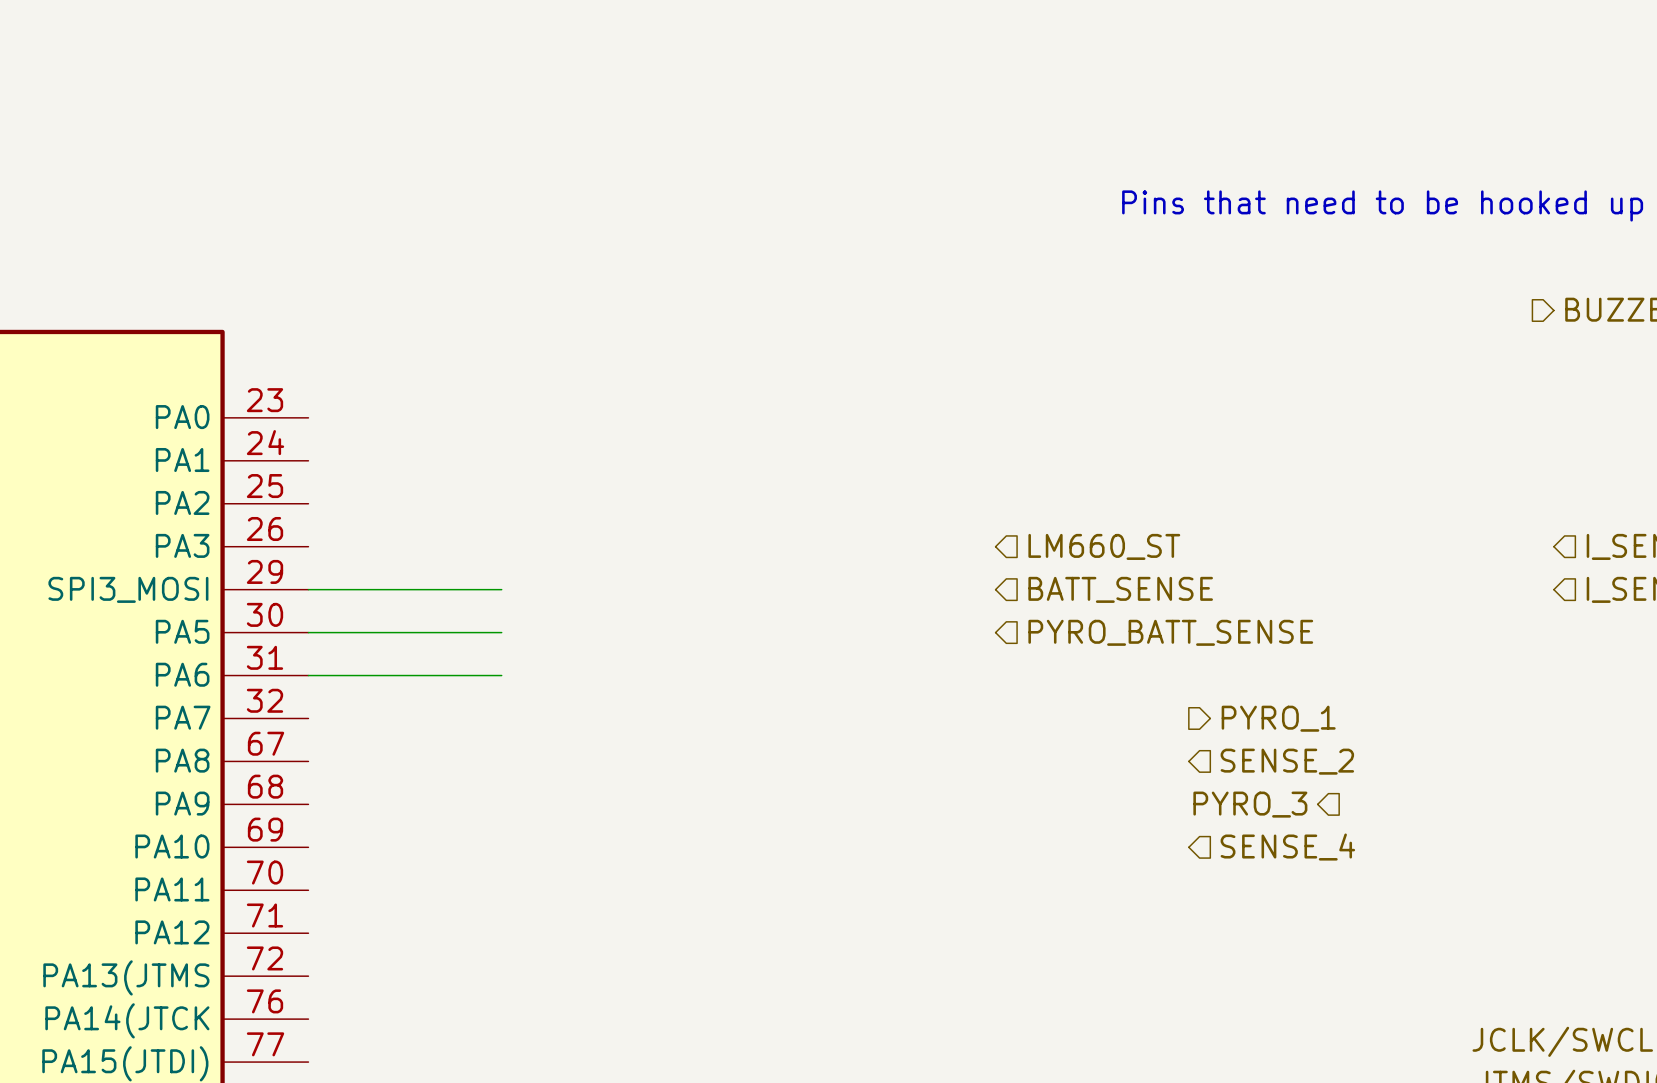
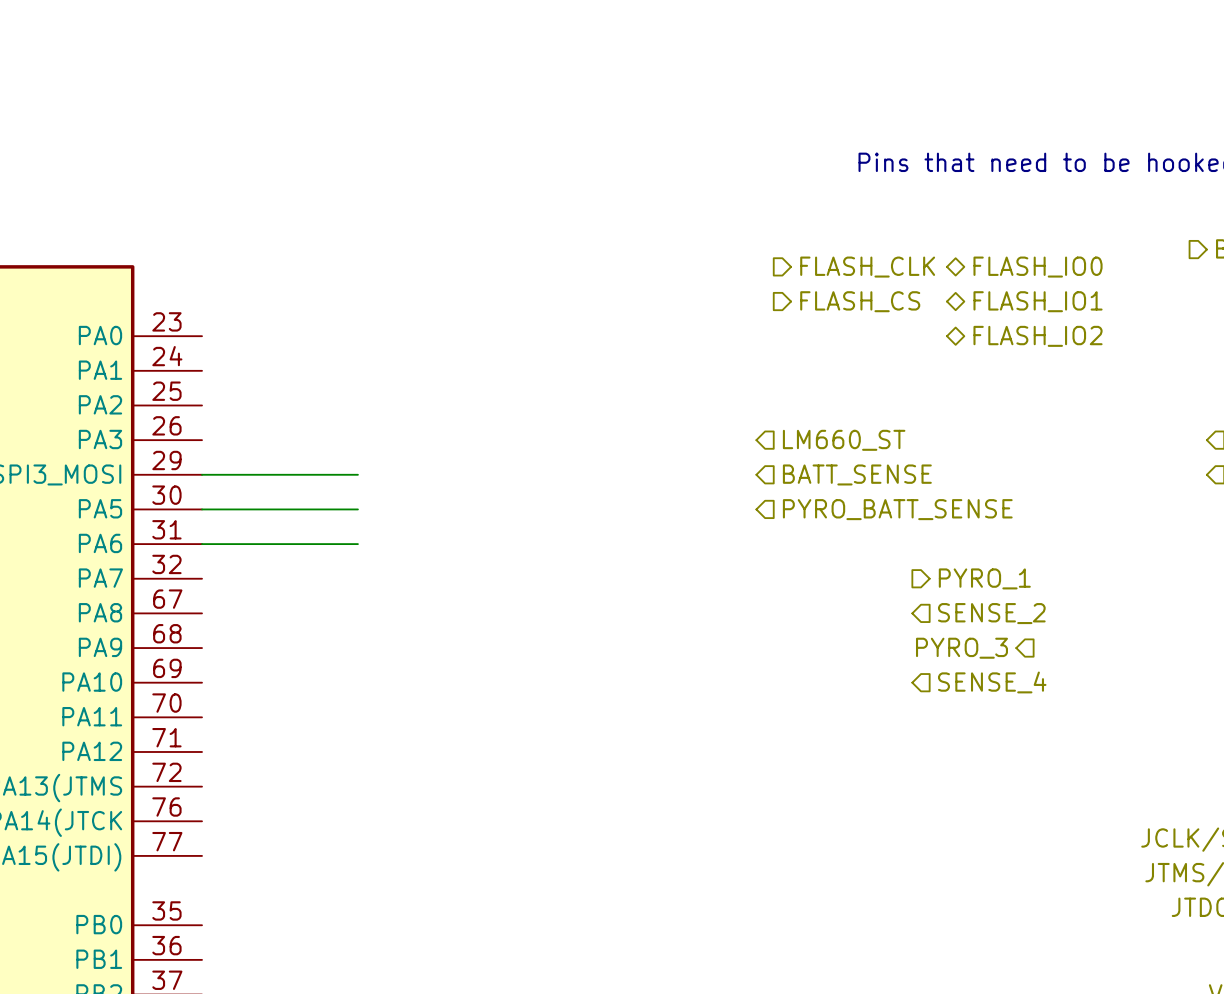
hierarchical label: none -> FLASH_CLK (867, 267)
hierarchical label: none -> FLASH_IO0 (1038, 267)
hierarchical label: none -> FLASH_CS (860, 301)
hierarchical label: none -> FLASH_IO1 (1038, 301)
hierarchical label: none -> FLASH_IO2 (1038, 336)

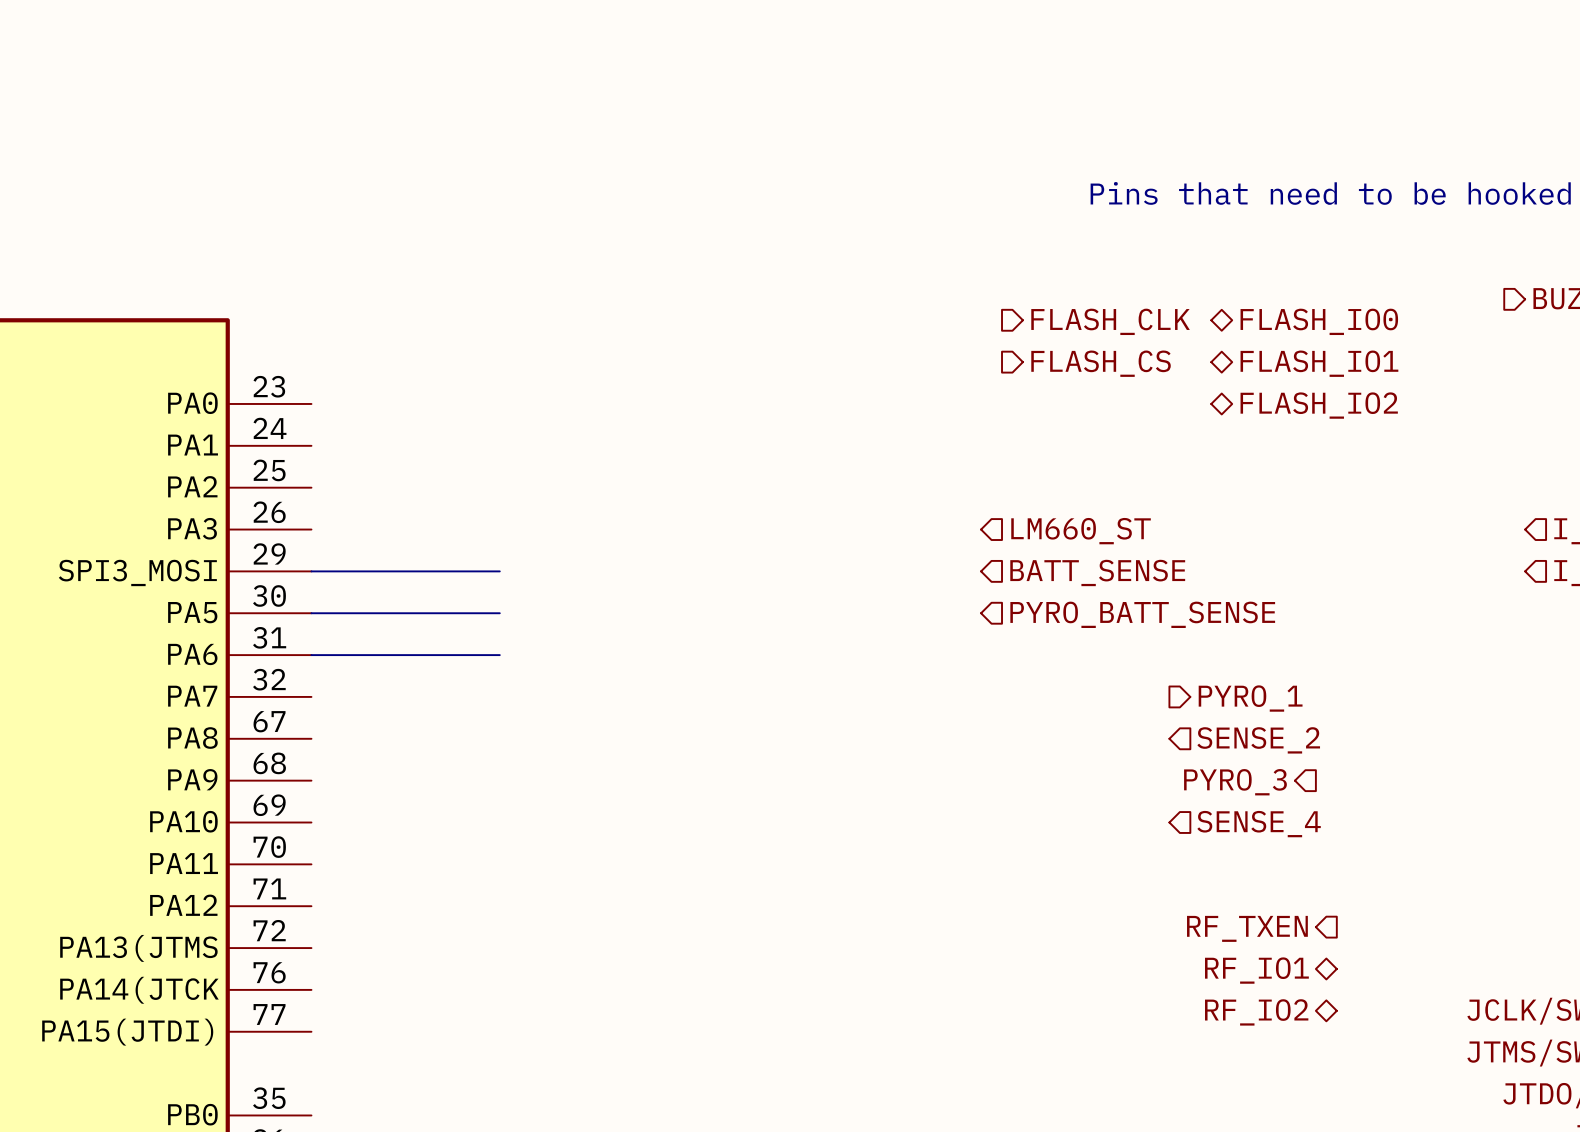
hierarchical label: none -> RF_TXEN (1247, 928)
hierarchical label: none -> RF_IO1 (1256, 970)
hierarchical label: none -> RF_IO2 (1256, 1012)

